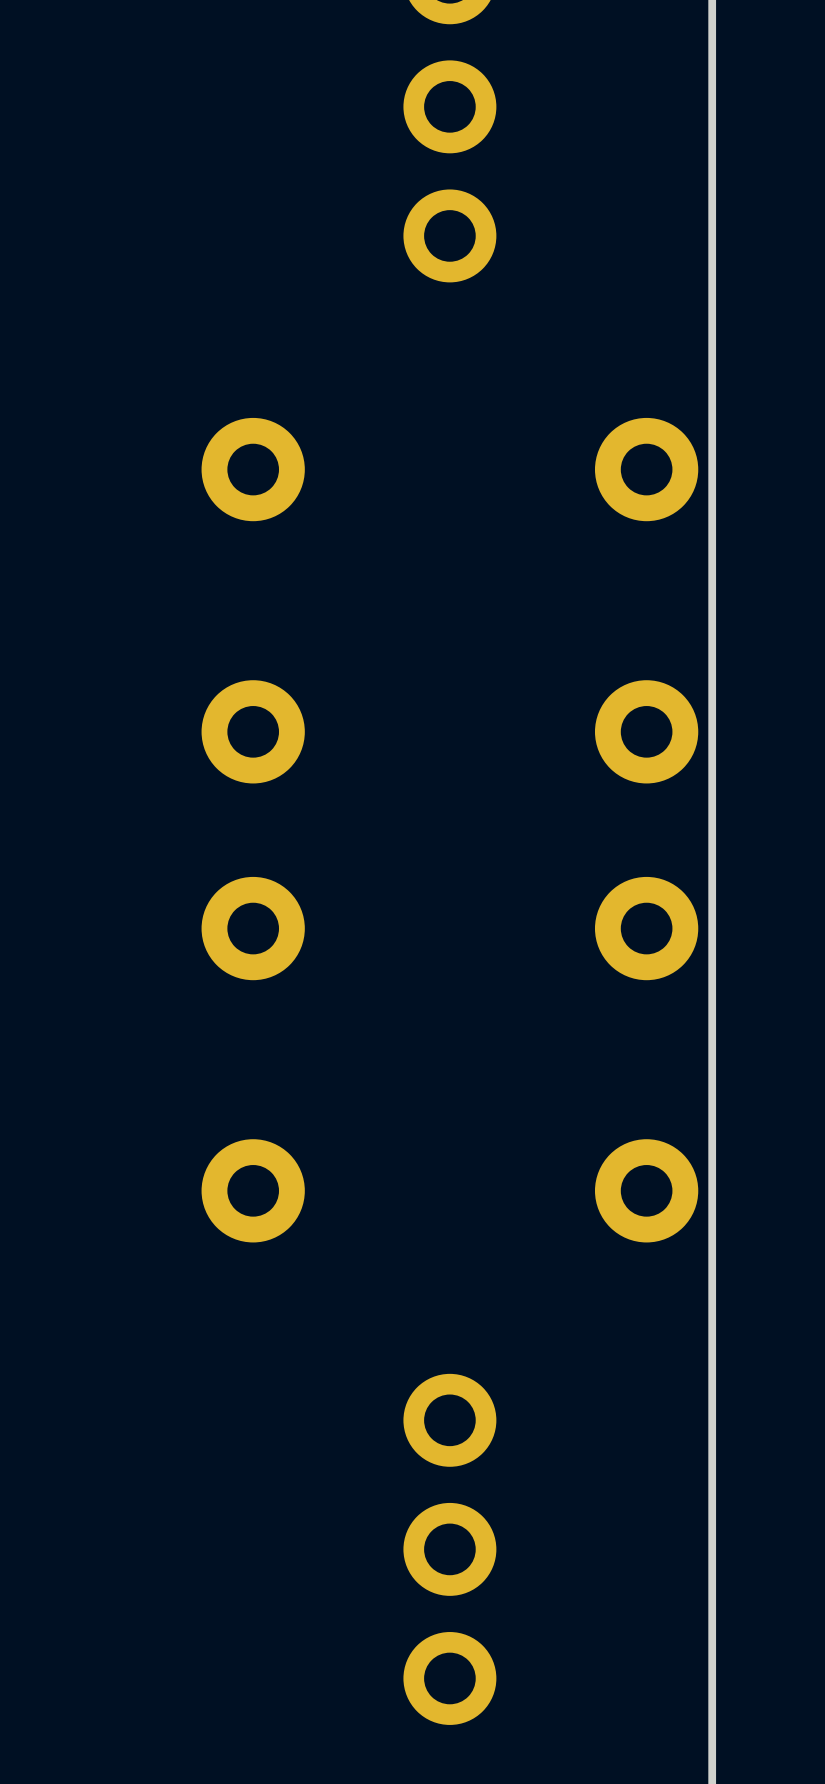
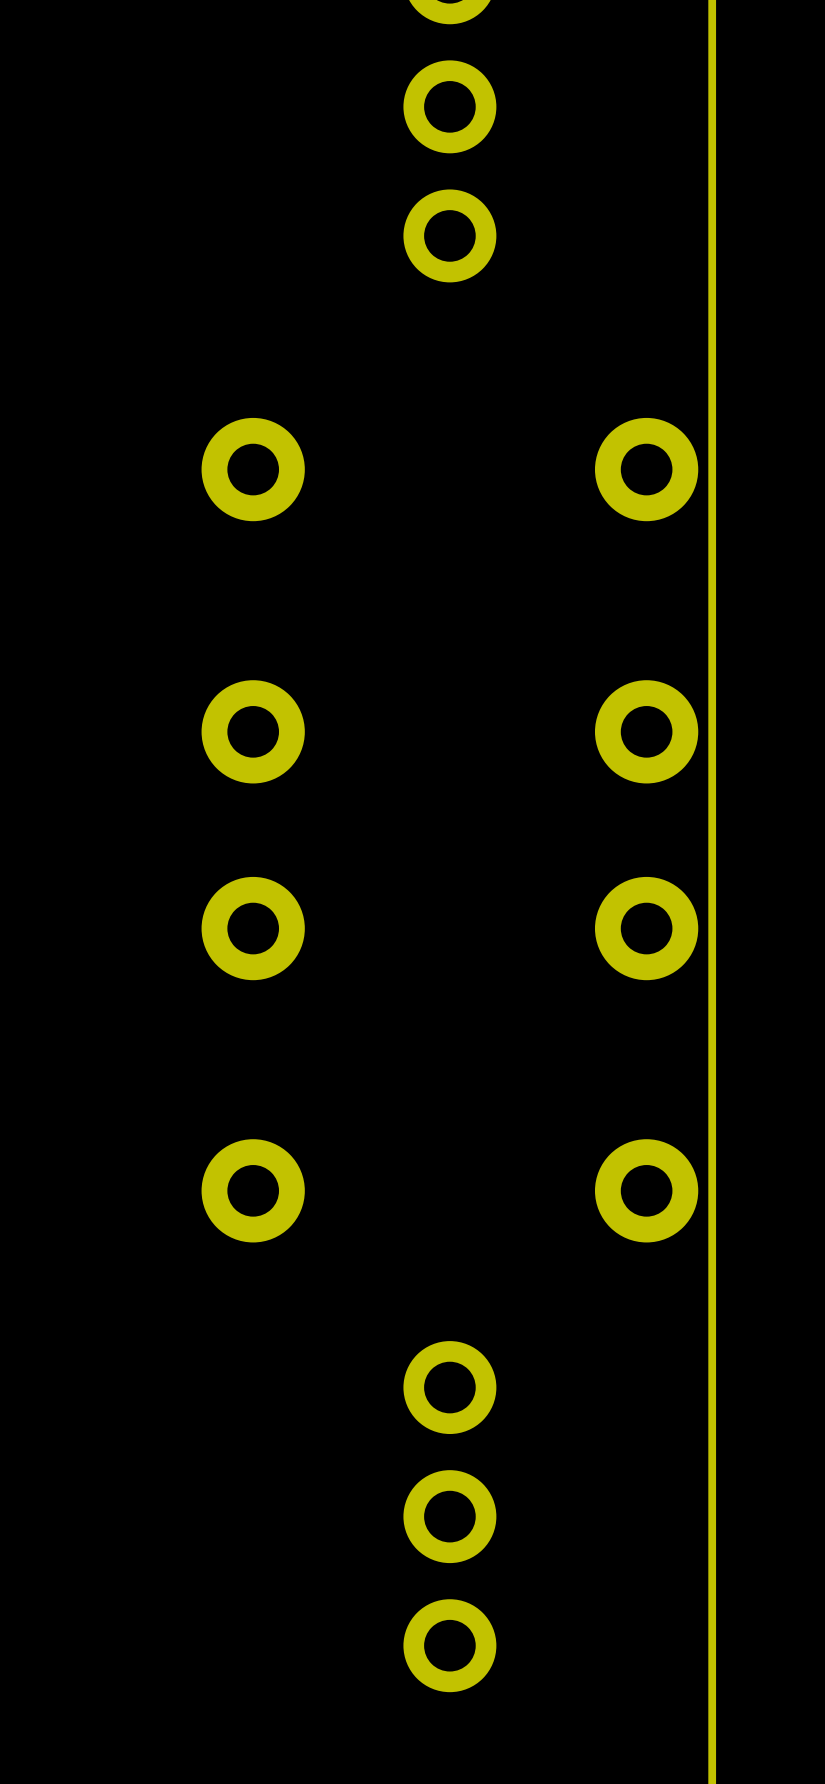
part position: (449, 1549) -> (449, 1516)

